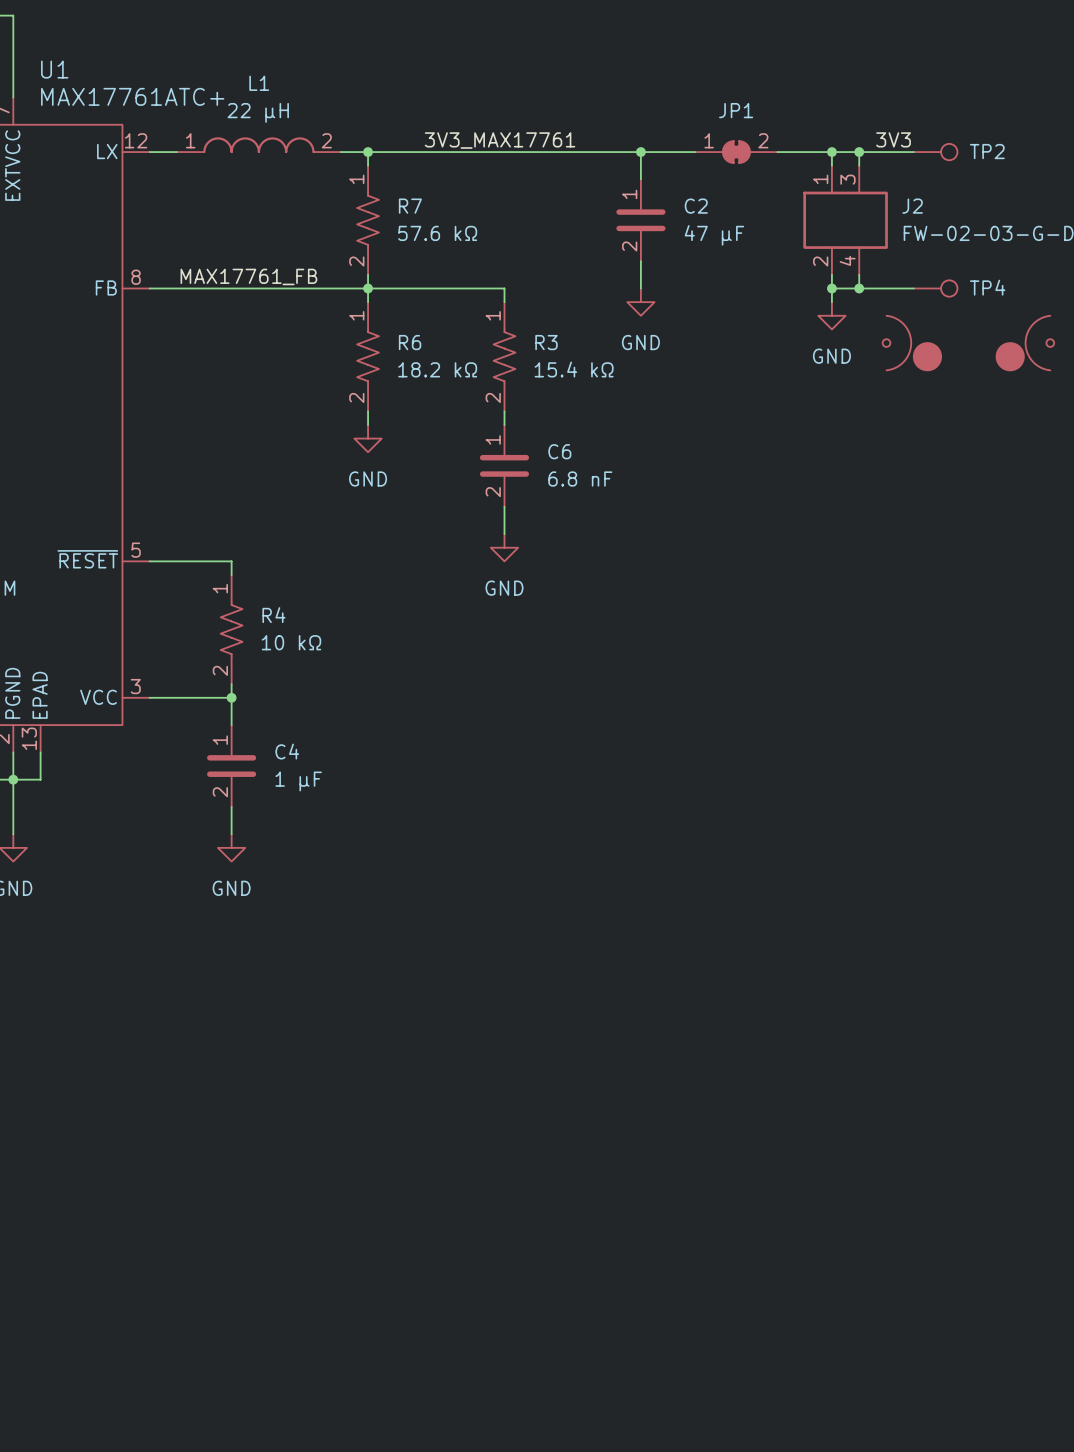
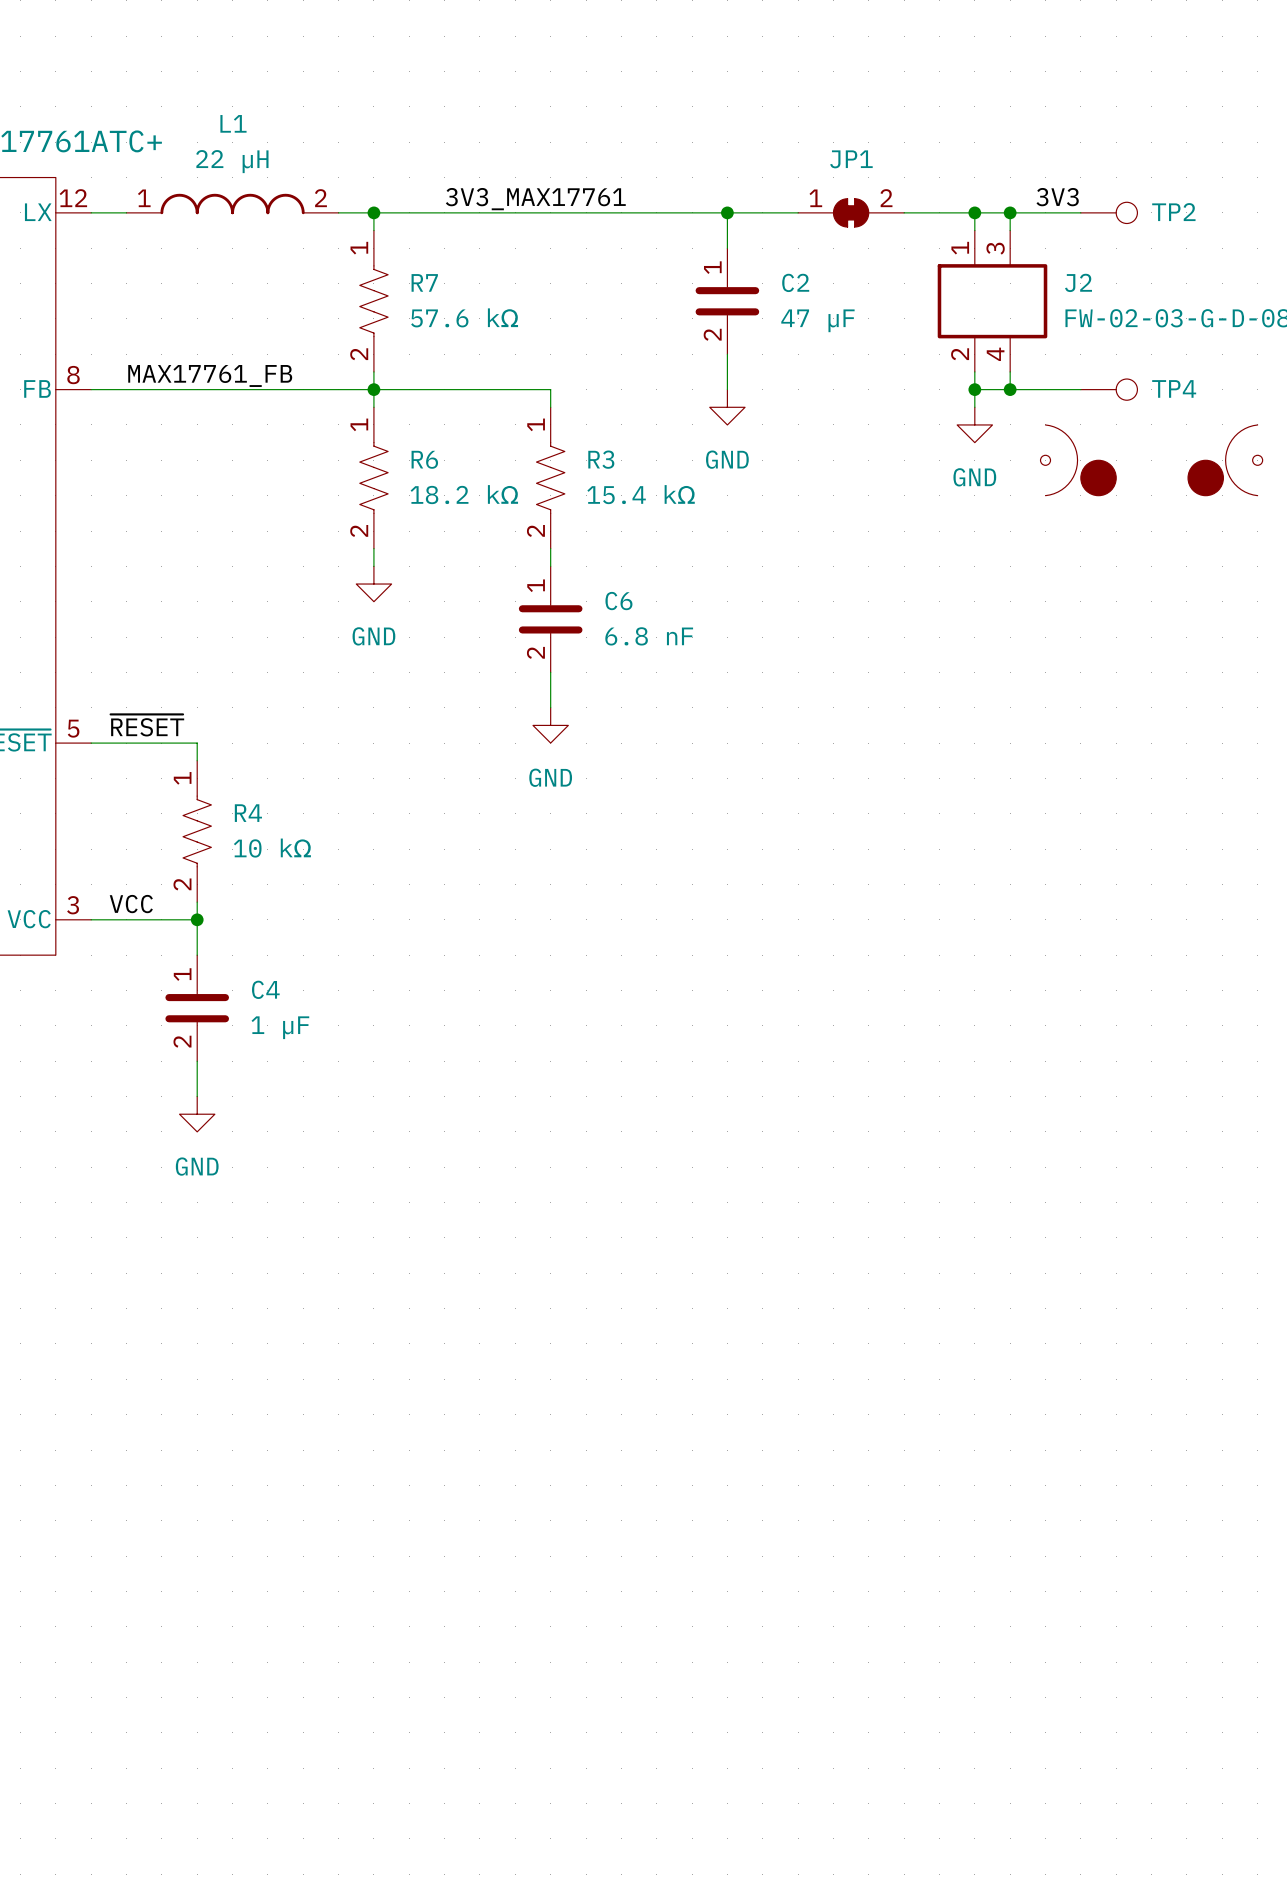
label: none -> ~{RESET} (147, 725)
label: none -> VCC (131, 904)

